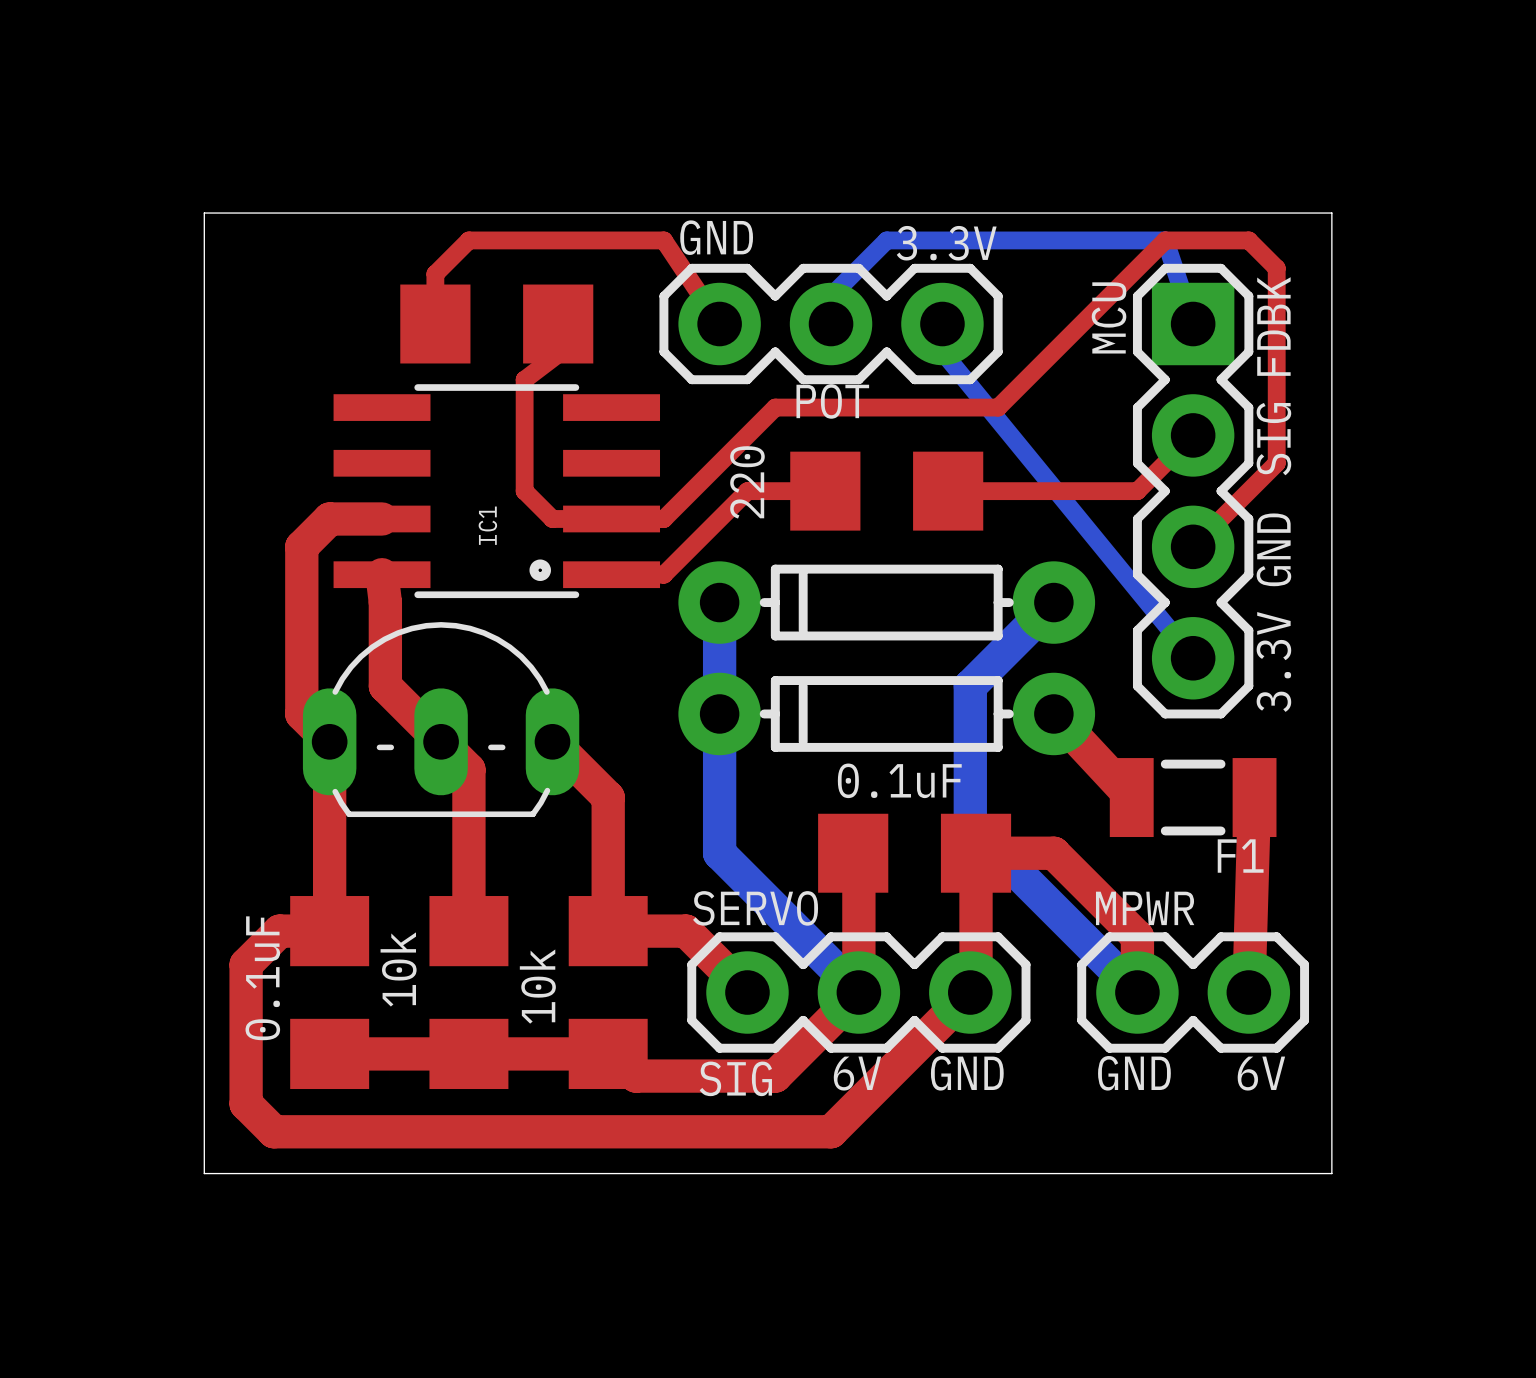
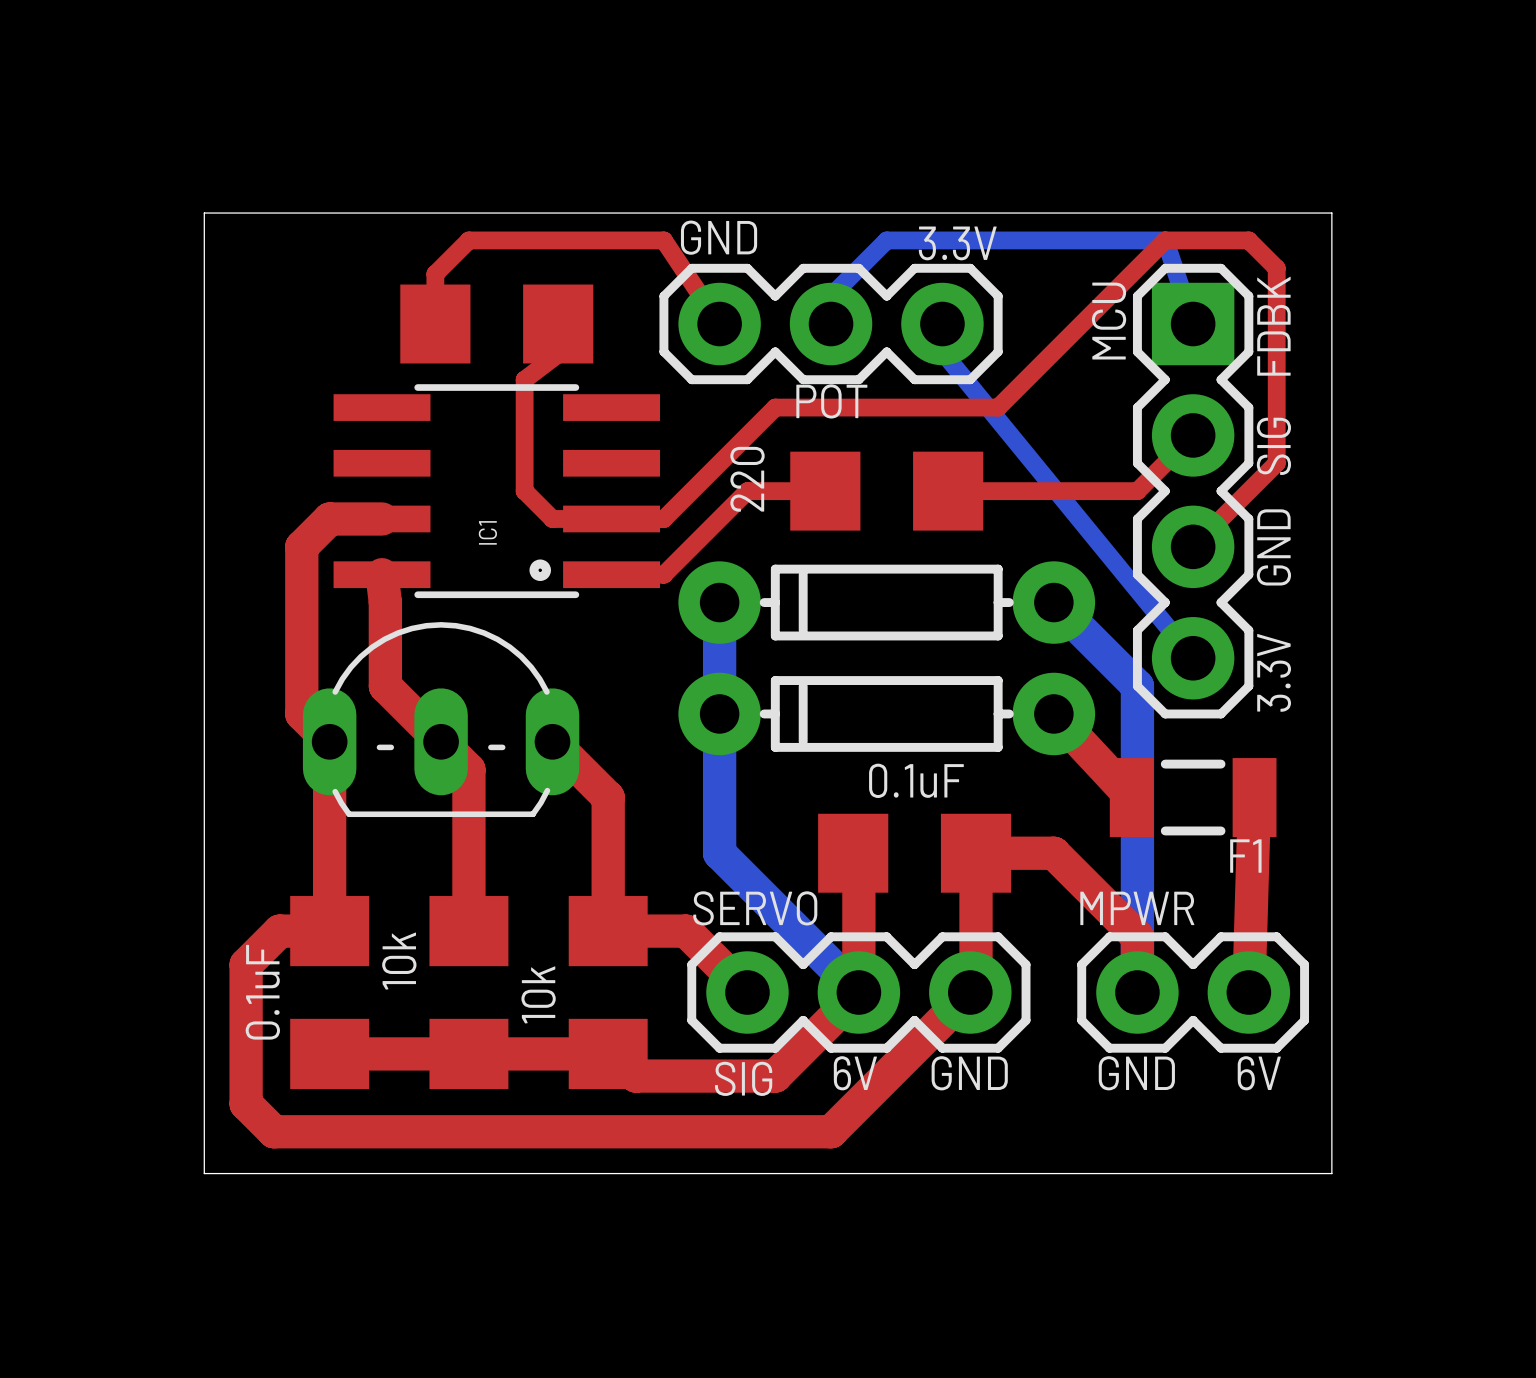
bottom track: (1053, 602) (970, 686) (970, 825) (1137, 992) -> (1053, 602) (1137, 686) (1137, 992)

